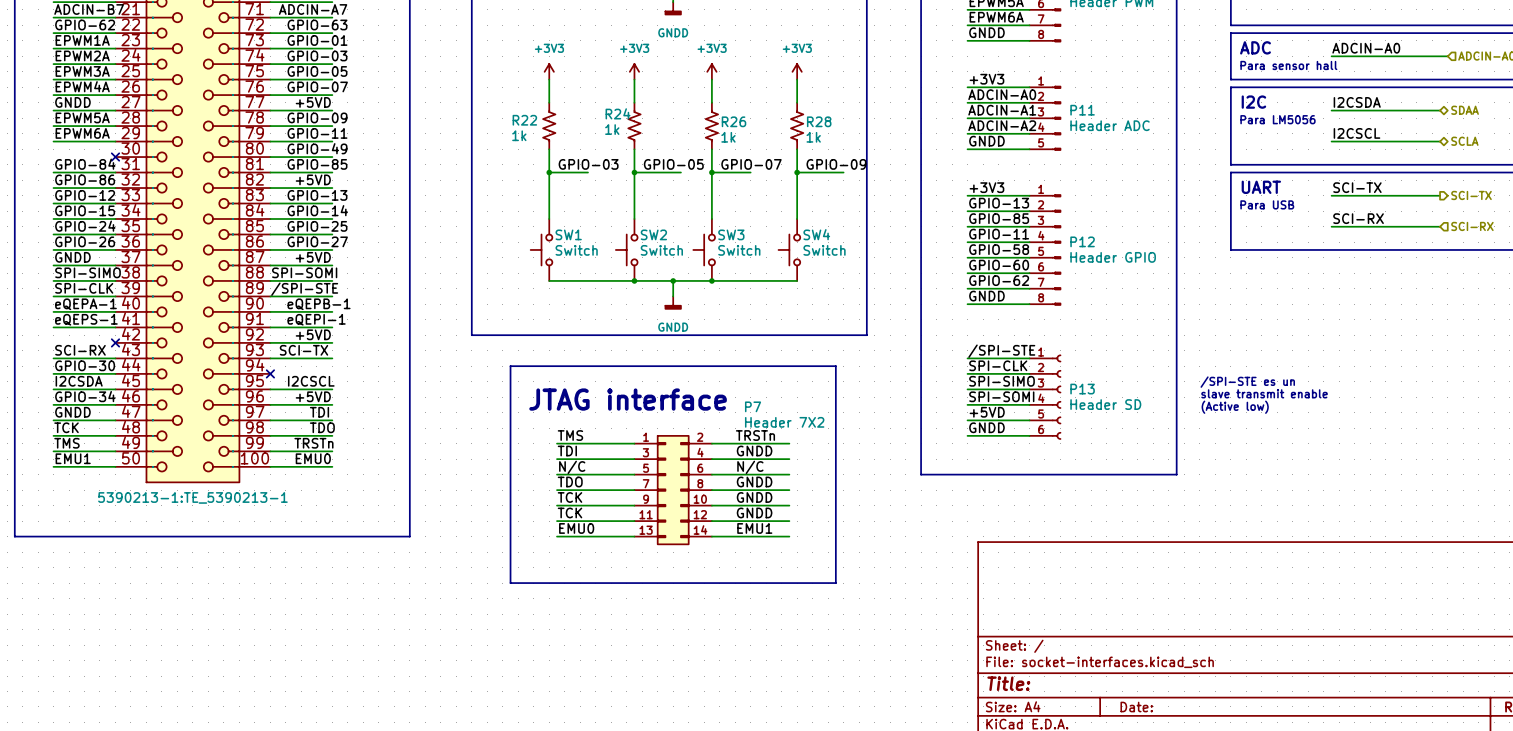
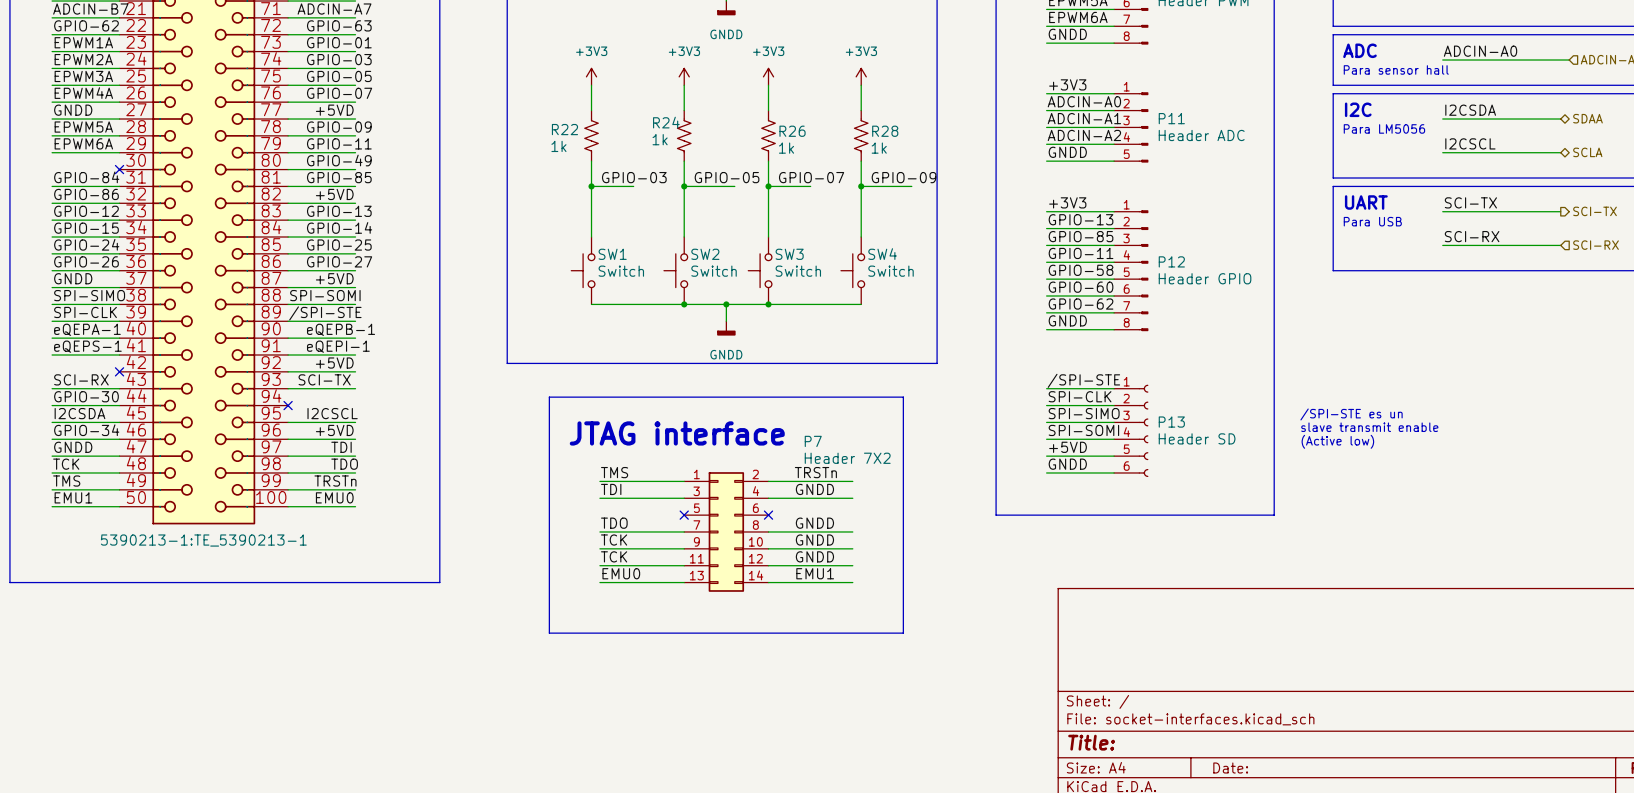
label: N/C (572, 467) -> none
label: N/C (750, 467) -> none
wire: (557, 474) (634, 474) -> none
no-connect mark: none -> (684, 515)
wire: (711, 474) (789, 474) -> none
no-connect mark: none -> (768, 515)

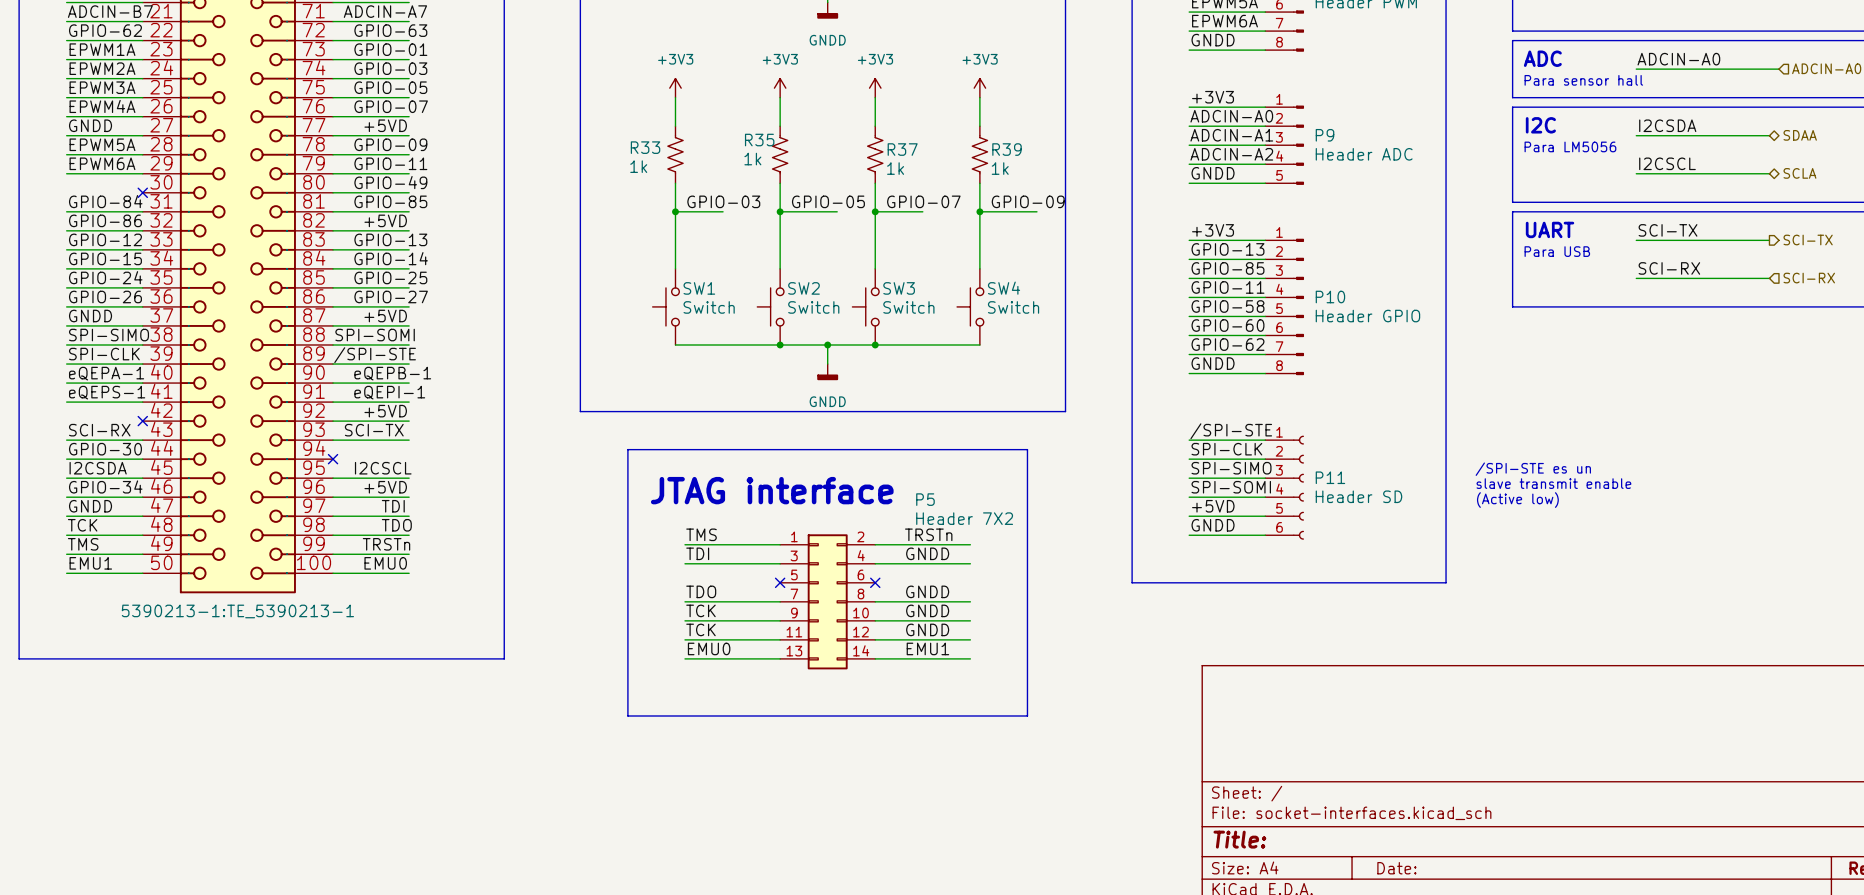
P11 name: P11 (1171, 118) -> P9 (1325, 135)
R24 name: R24 (666, 122) -> R35 (759, 140)
R22 name: R22 (564, 129) -> R33 (645, 147)
R26 name: R26 (792, 131) -> R37 (902, 149)
R28 name: R28 (885, 131) -> R39 (1007, 149)
P12 name: P12 (1171, 261) -> P10 (1330, 297)
P13 name: P13 (1171, 422) -> P11 (1330, 477)
P7 name: P7 (813, 441) -> P5 (925, 499)

